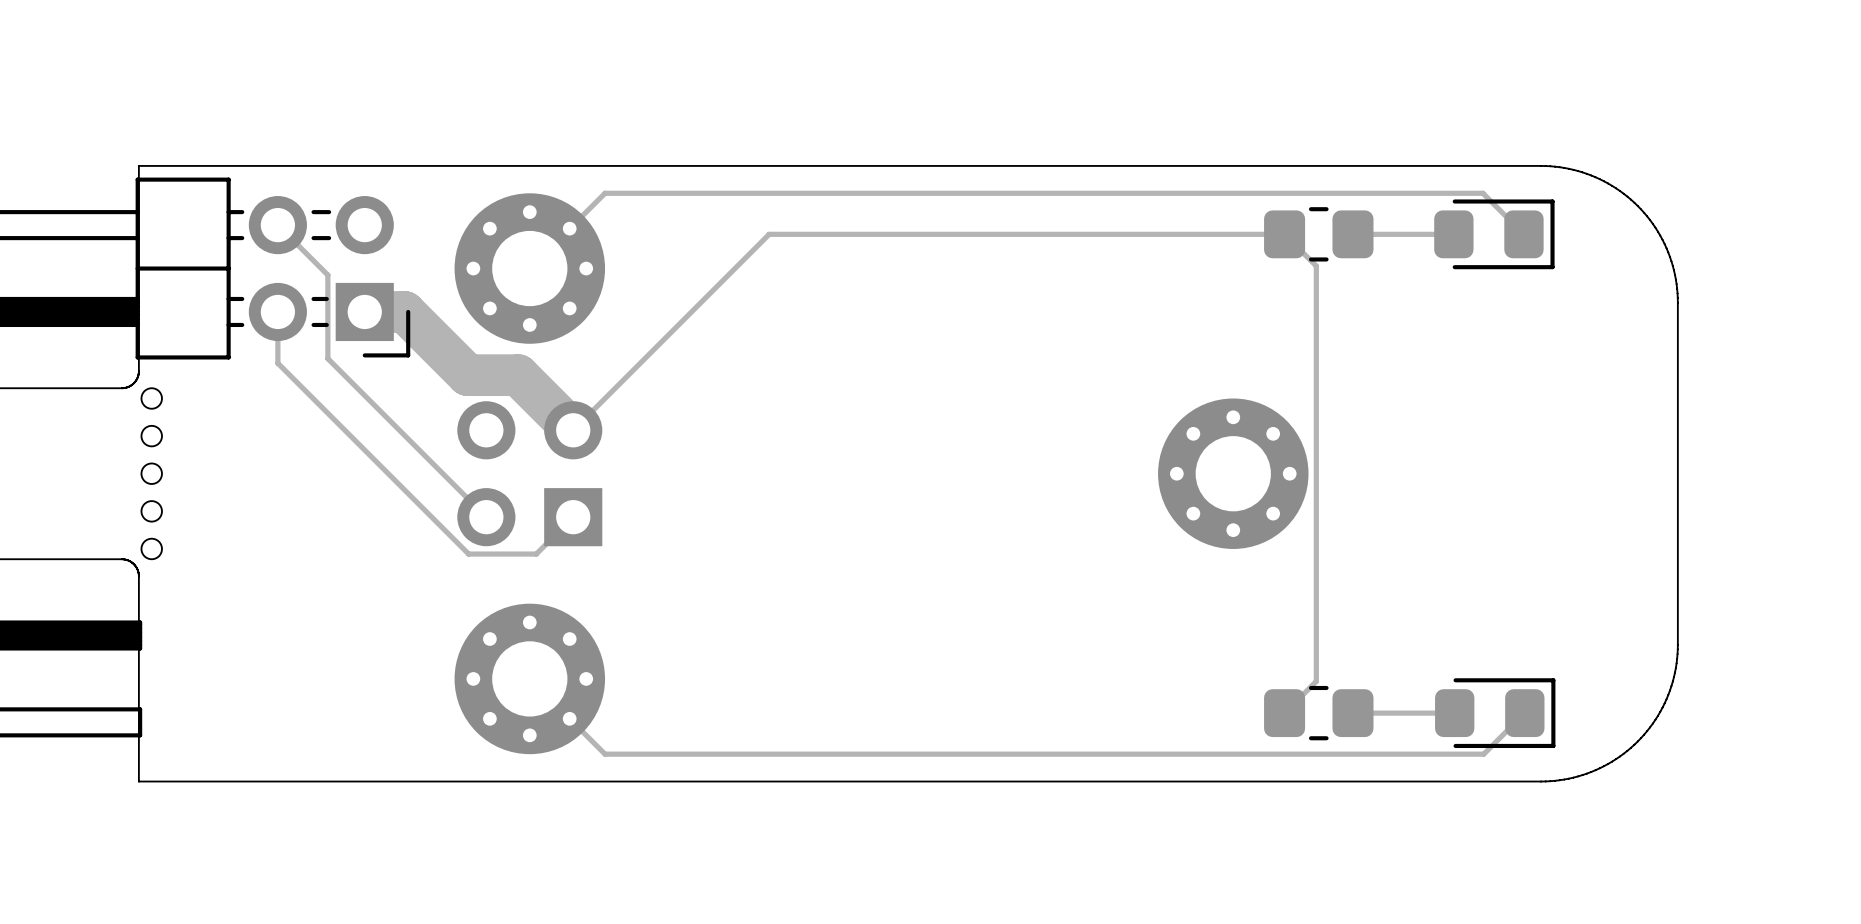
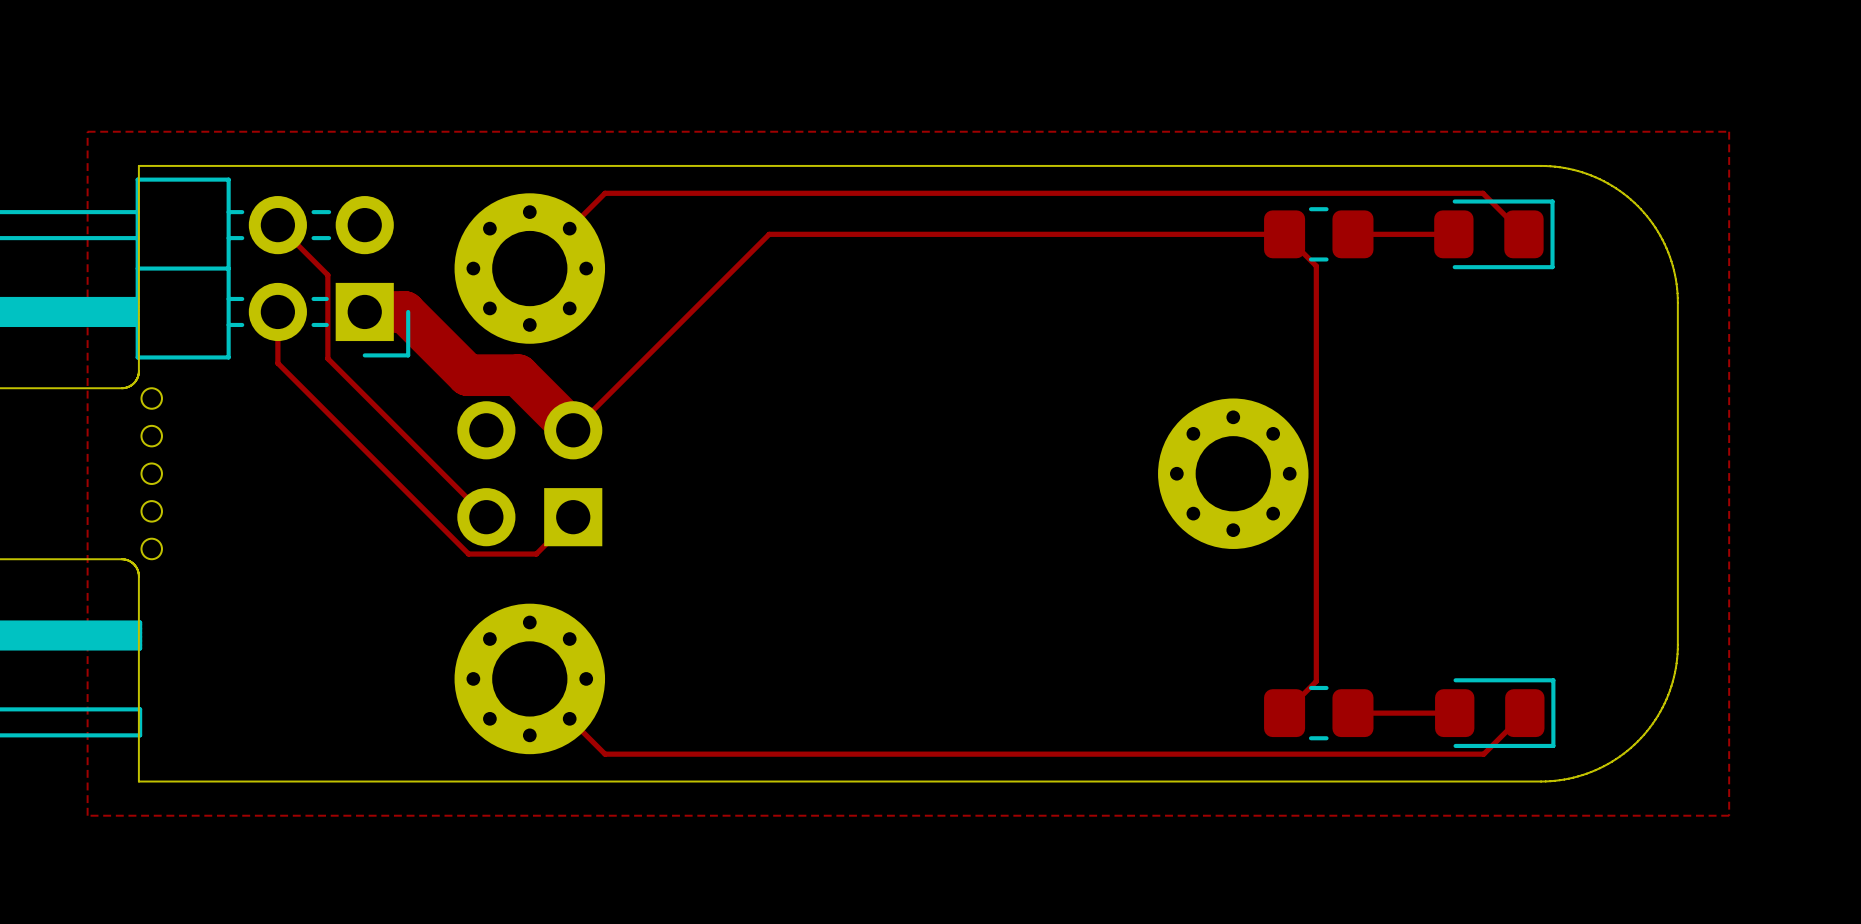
zone outline: none -> (87, 131) (1729, 131) (1729, 815) (87, 815) (87, 131)

